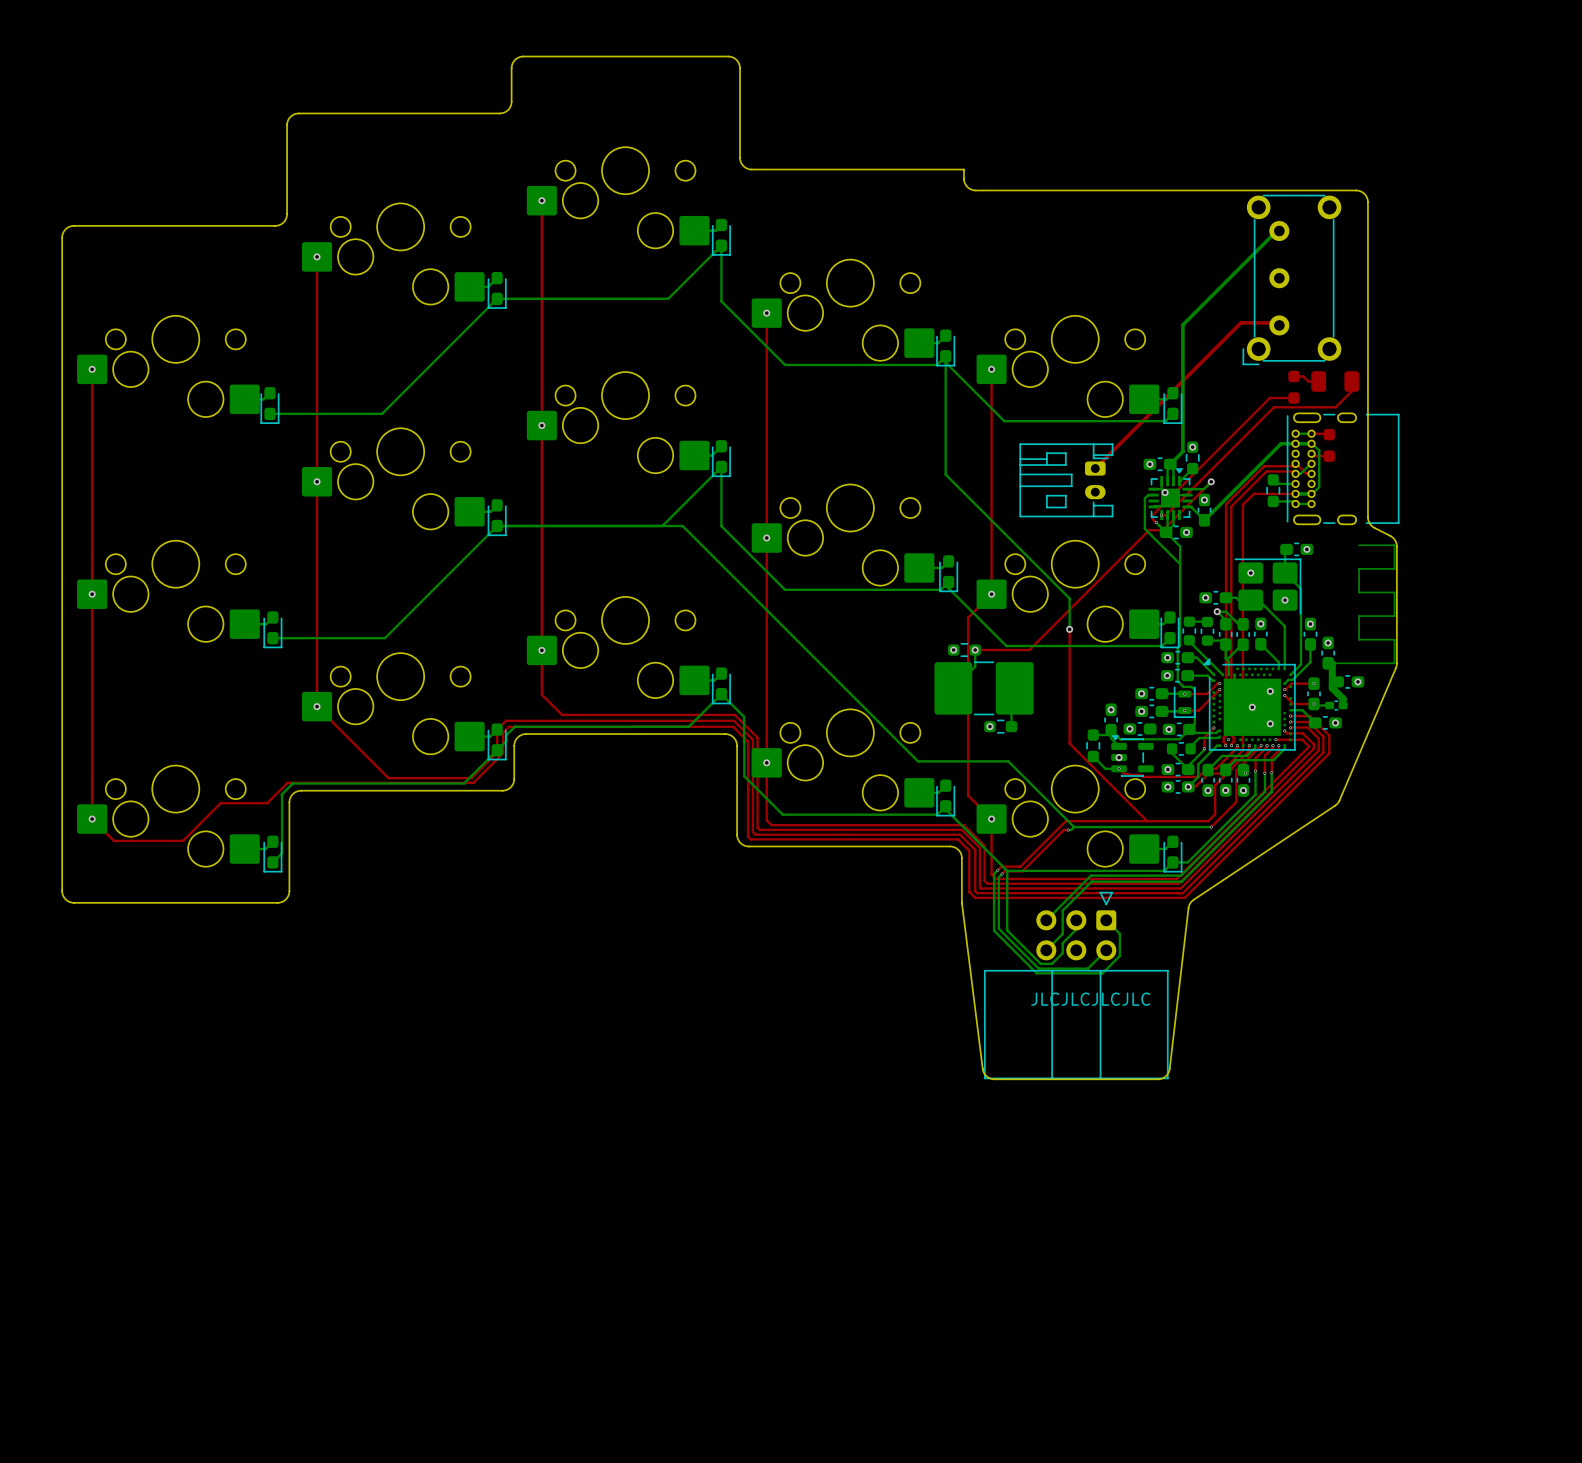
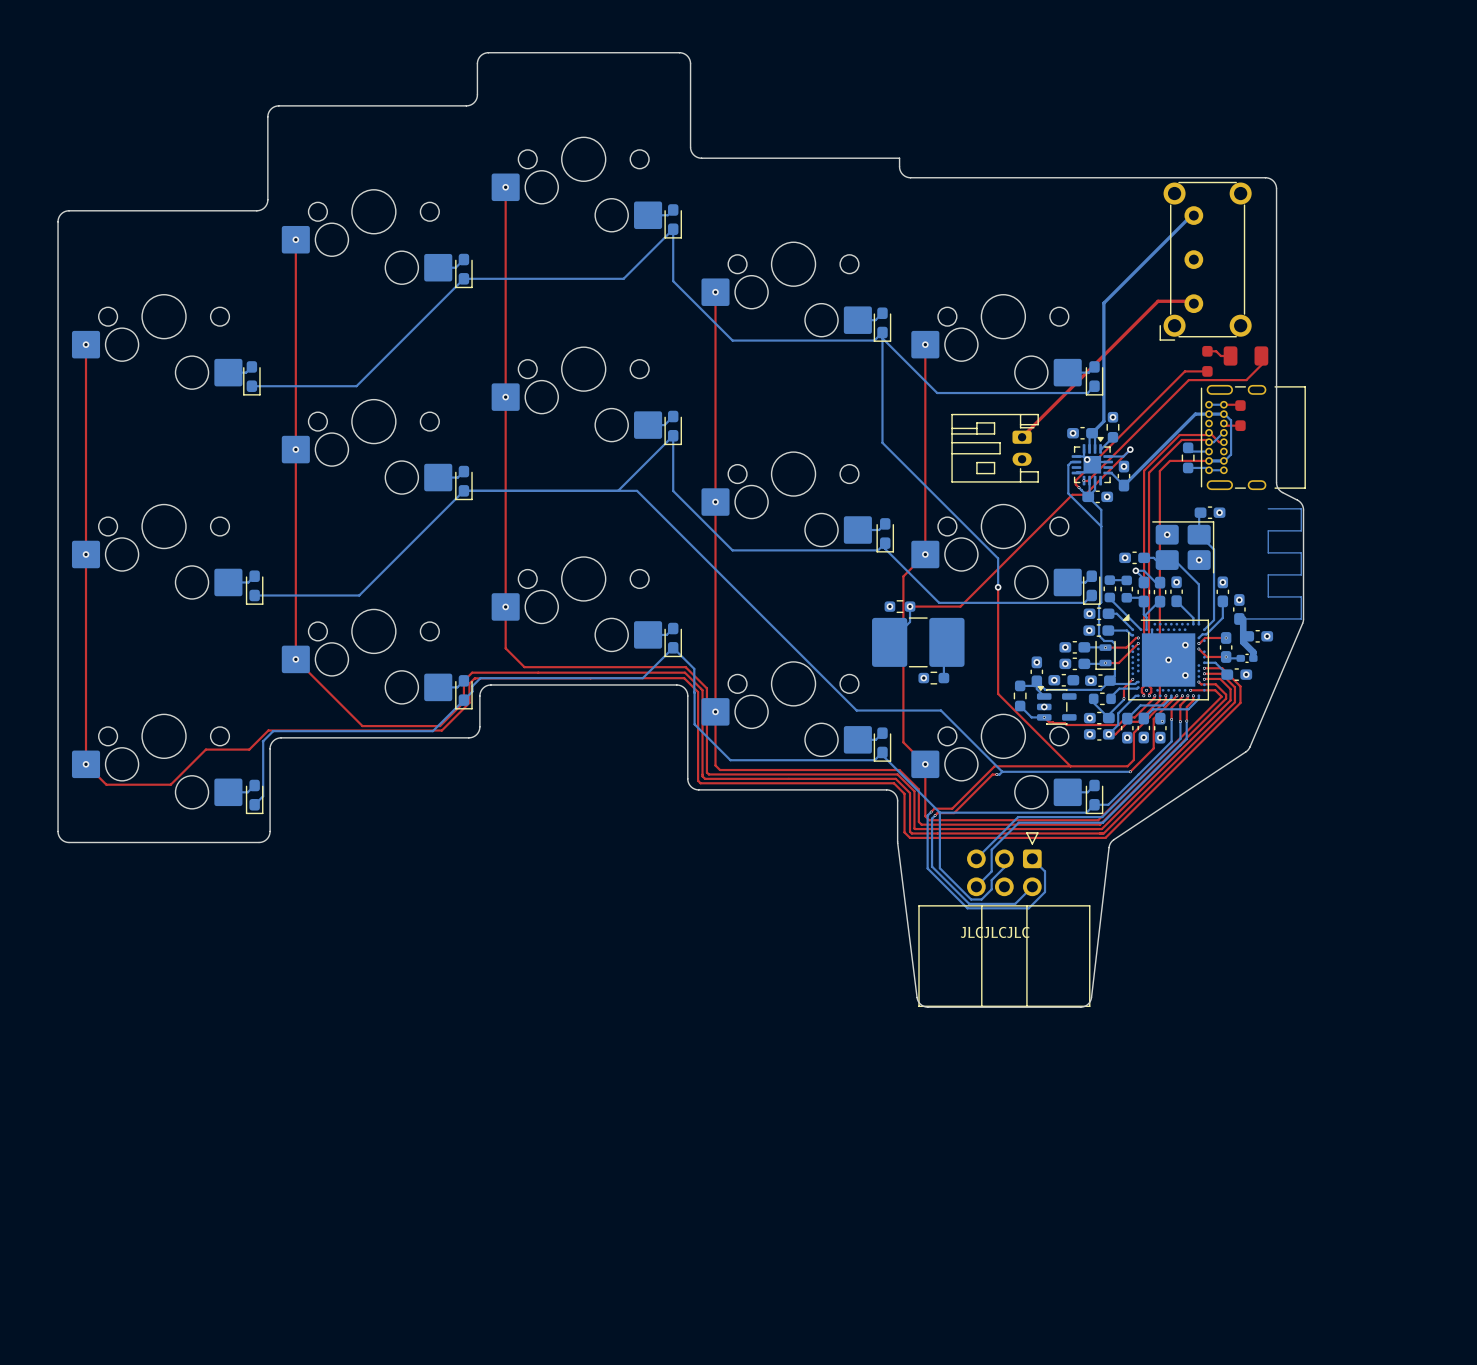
text: JLCJLCJLCJLC (1090, 999) -> JLCJLCJLC (995, 932)

